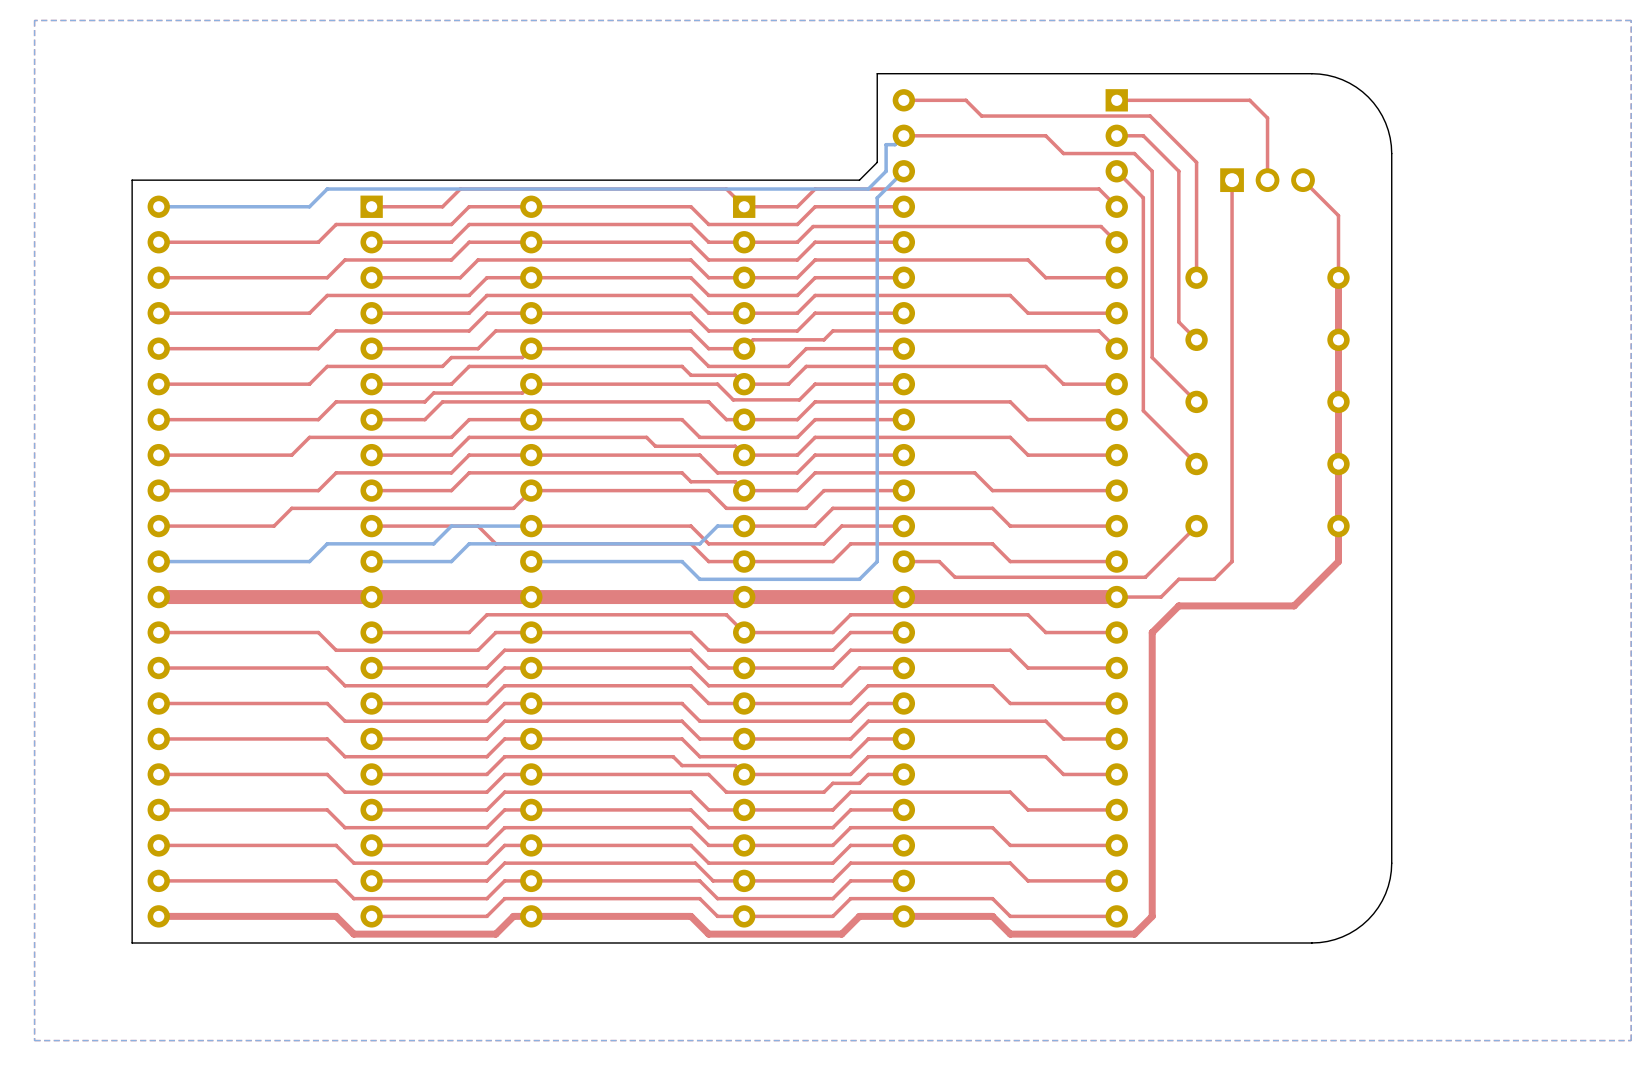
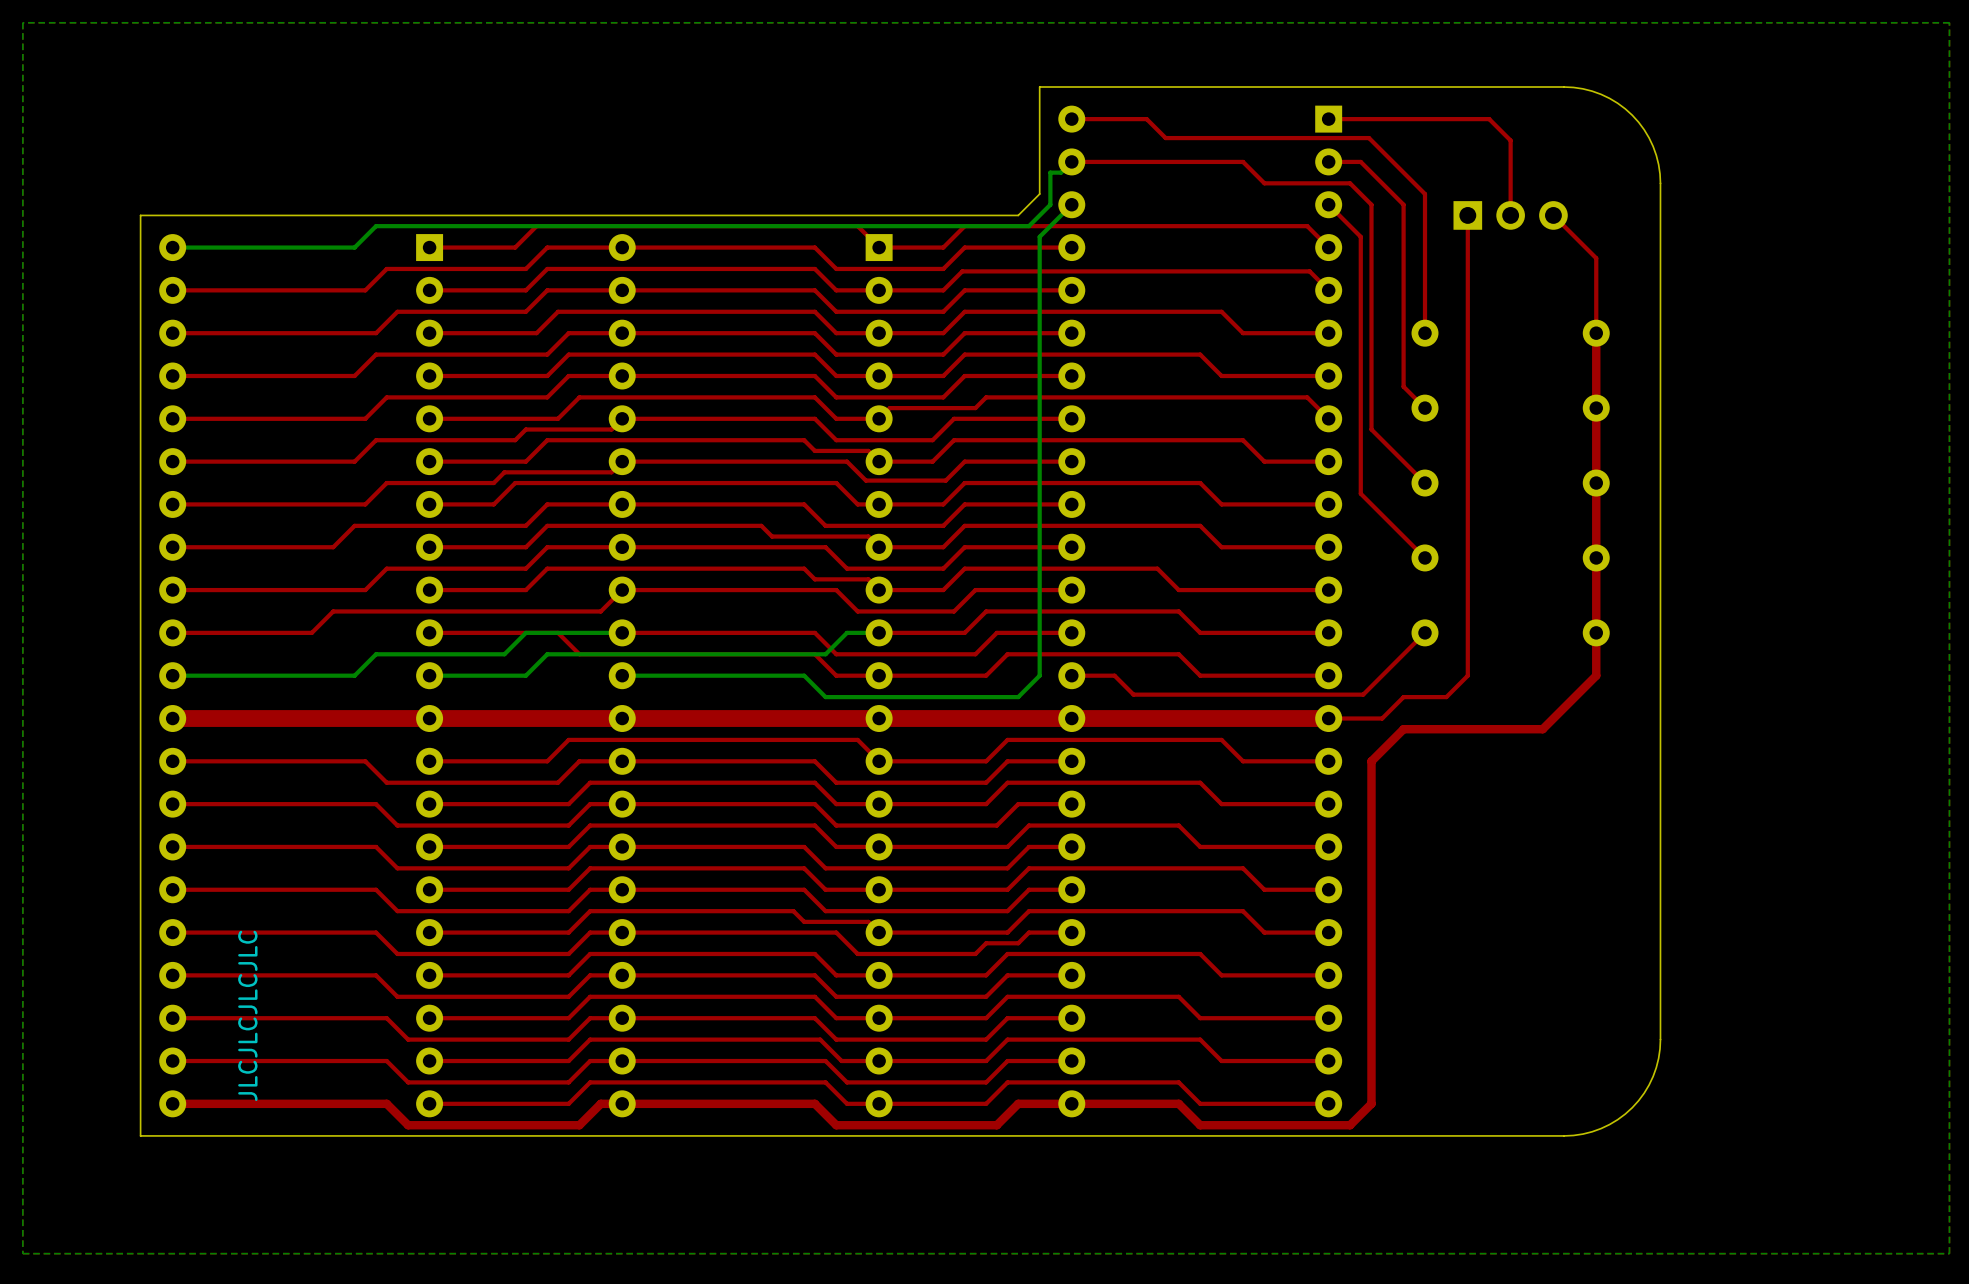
text: none -> JLCJLCJLCJLC (247, 1015)

